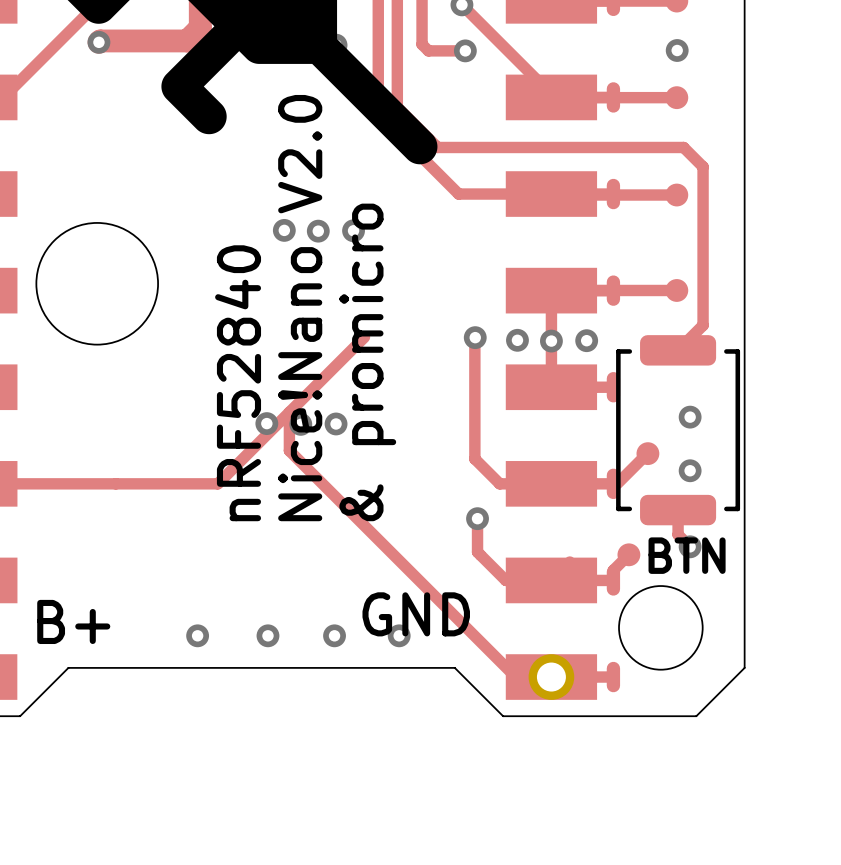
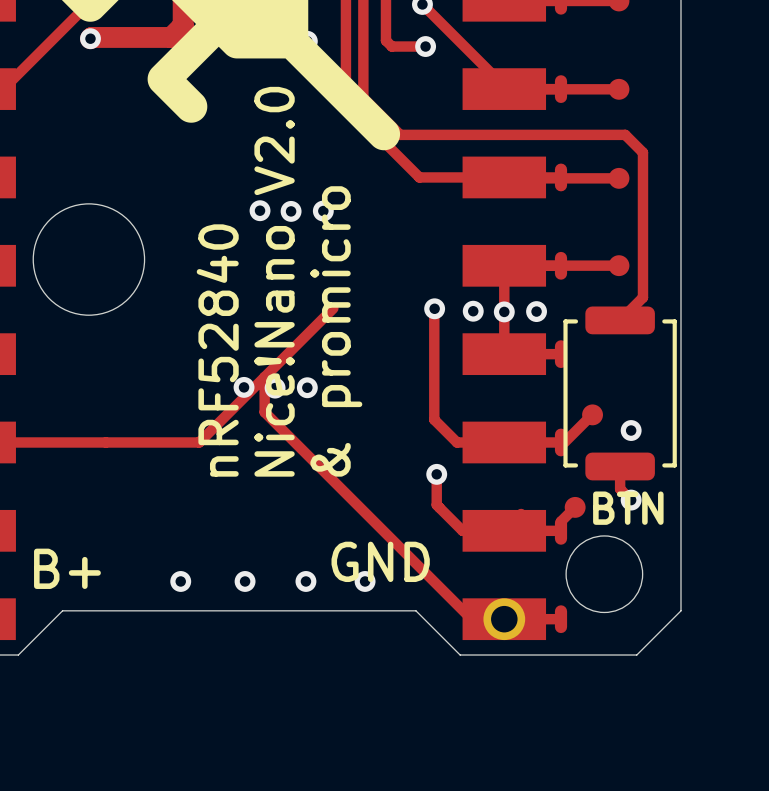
via: (677, 50) -> none
via: (690, 417) -> none

